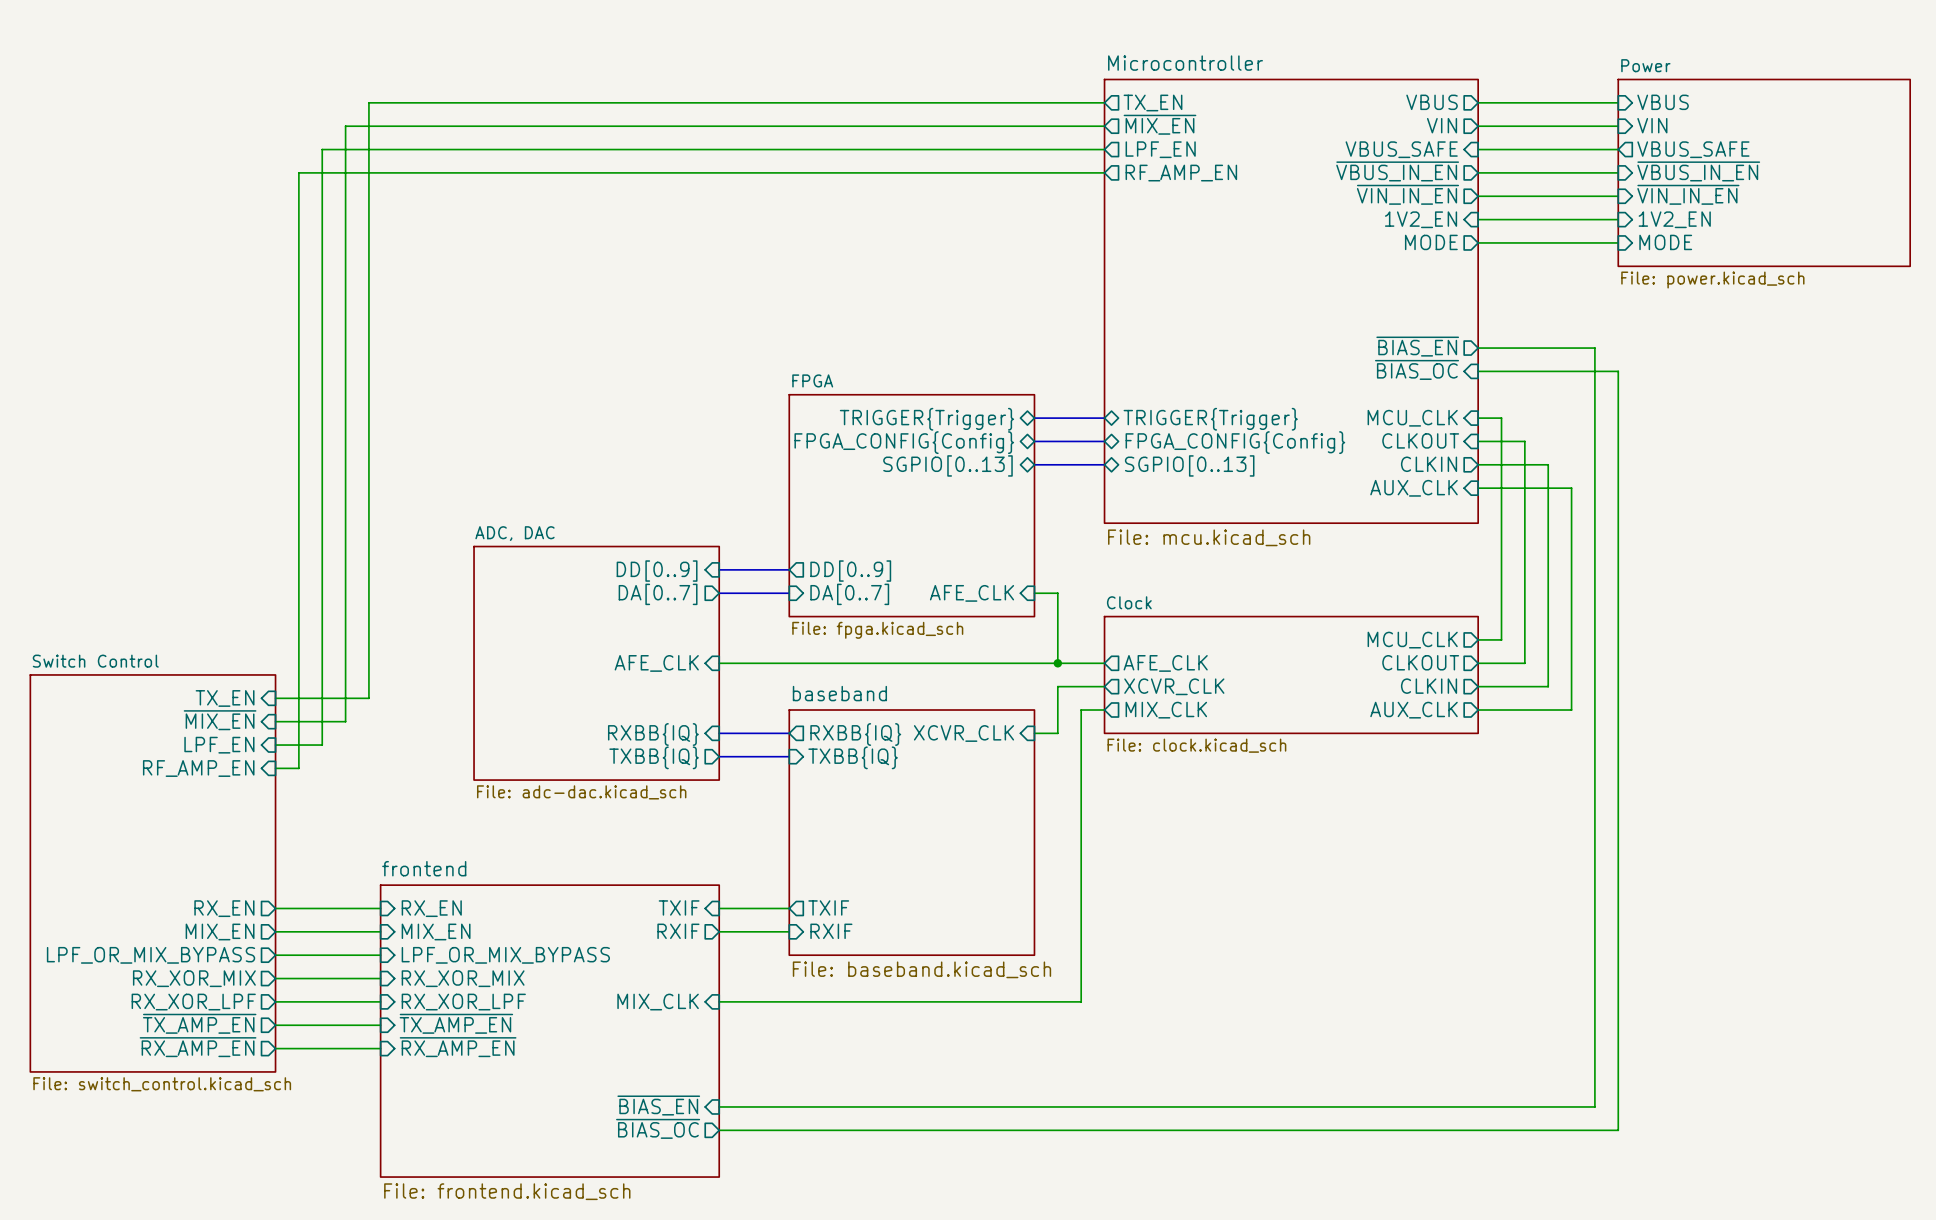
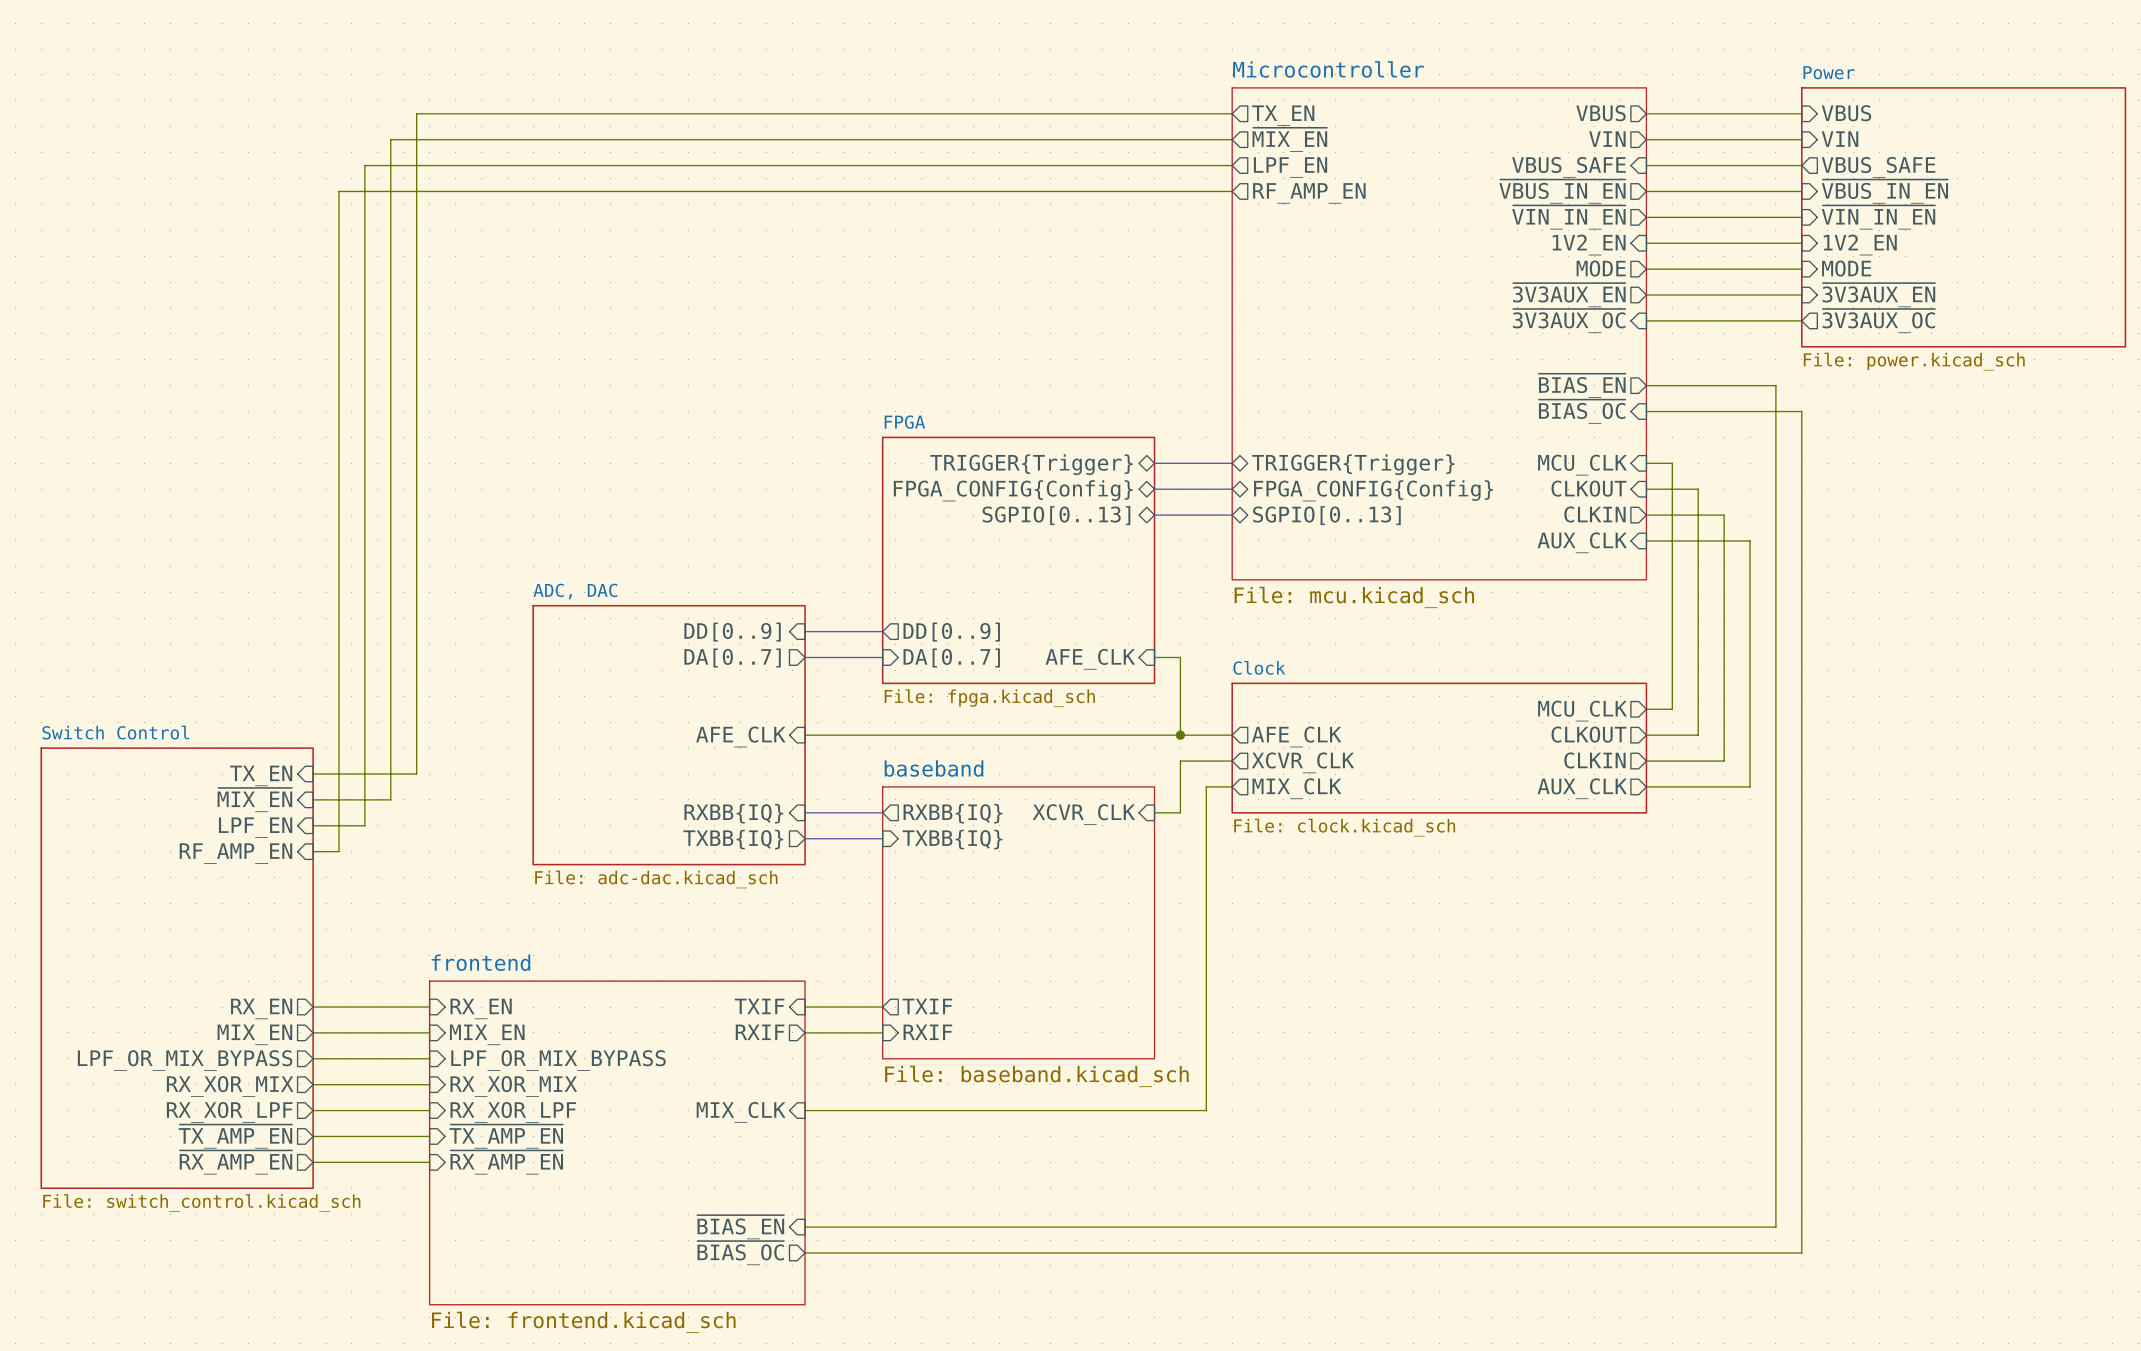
sheet Power: File: power.kicad_sch (1764, 172) -> none
sheet Power: none -> File: power.kicad_sch (1963, 217)
sheet pin: none -> ~{3V3AUX_EN} (1569, 295)
sheet pin: none -> ~{3V3AUX_EN} (1878, 295)
wire: none -> (1646, 295) (1801, 295)
sheet pin: none -> ~{3V3AUX_OC} (1569, 321)
sheet pin: none -> ~{3V3AUX_OC} (1878, 321)
wire: none -> (1646, 320) (1801, 320)

